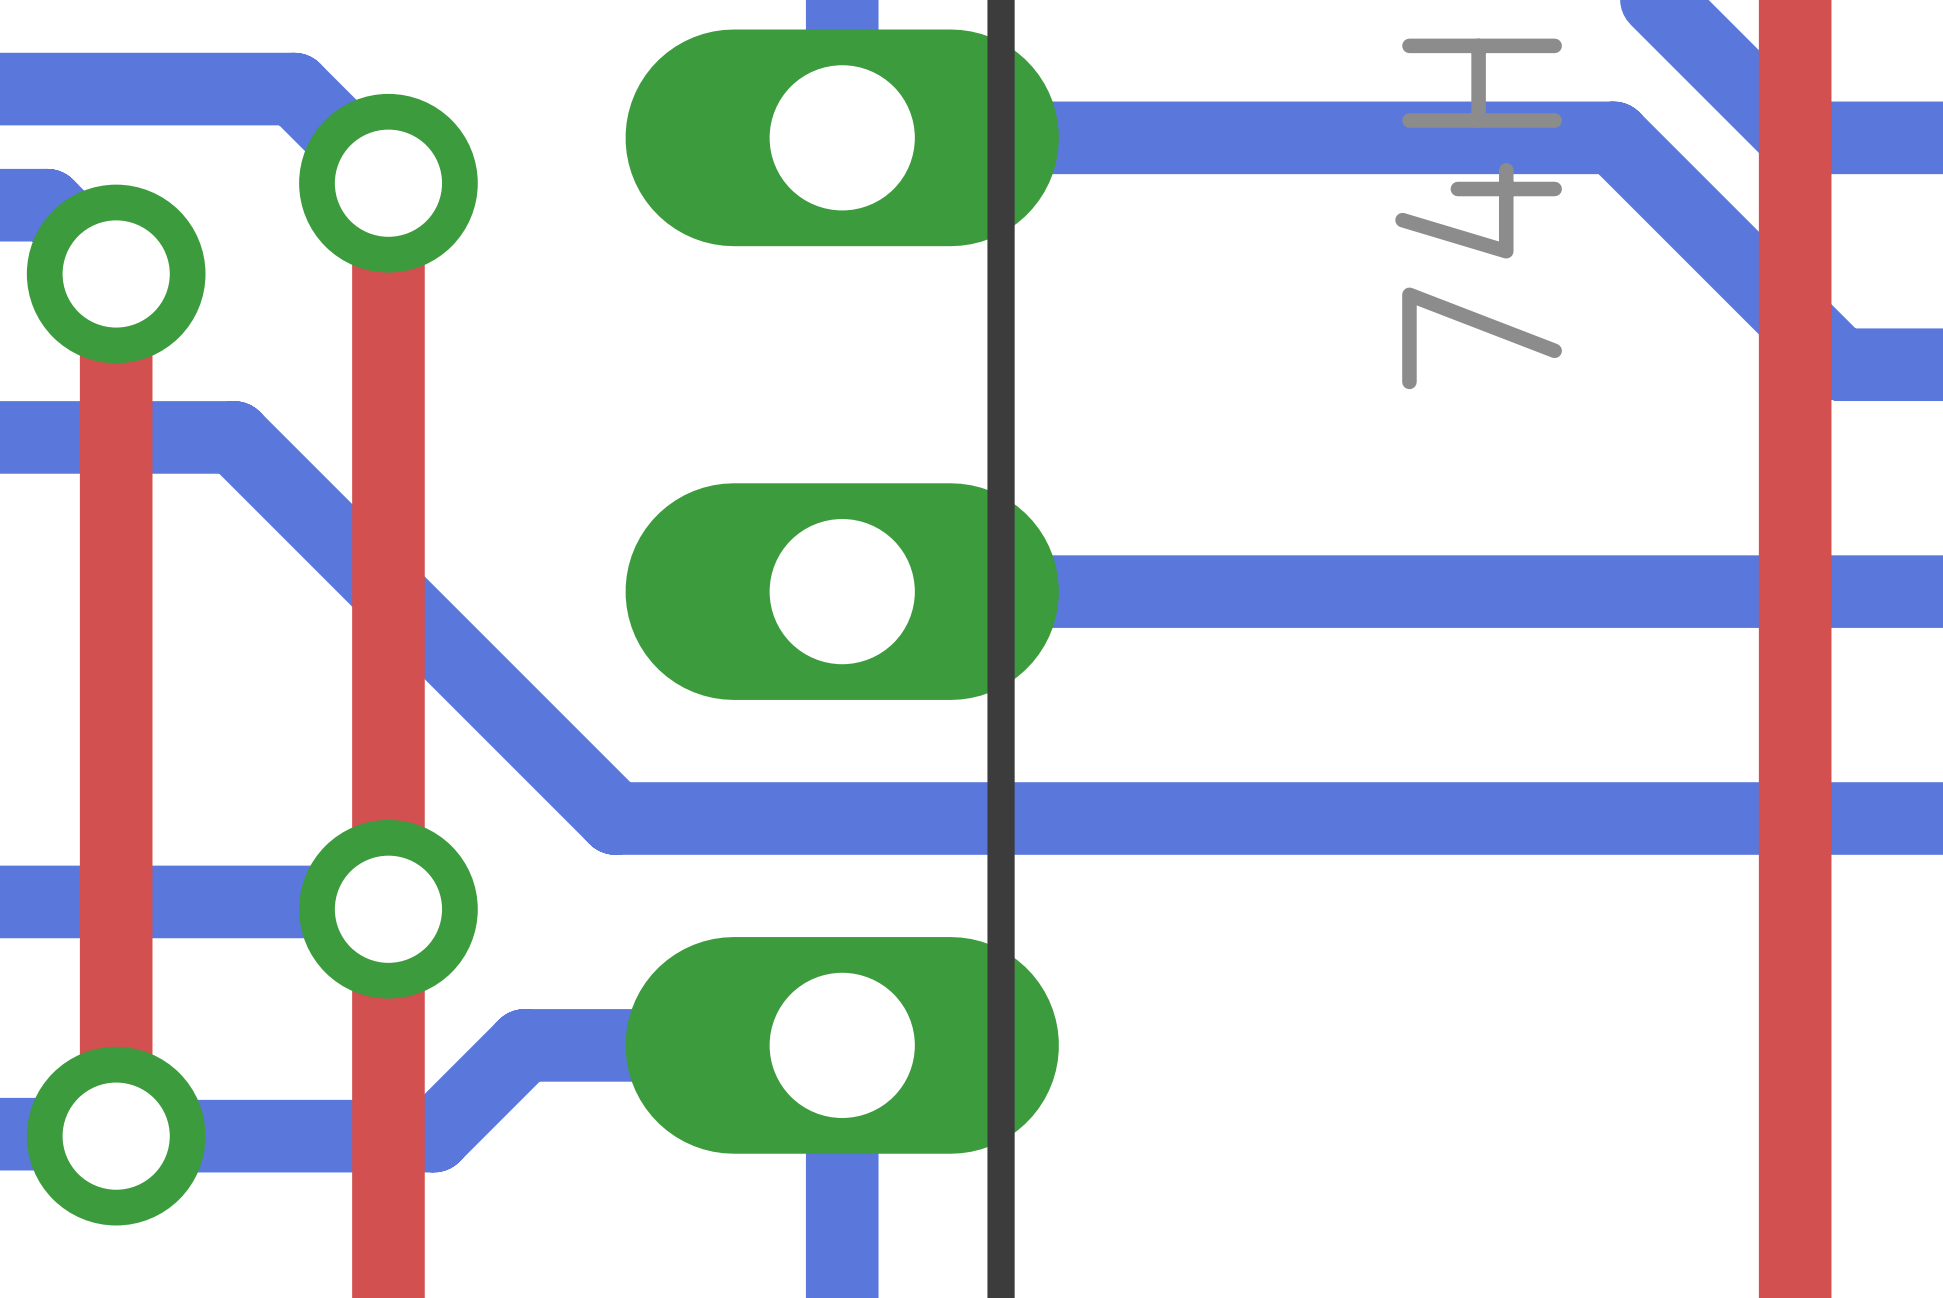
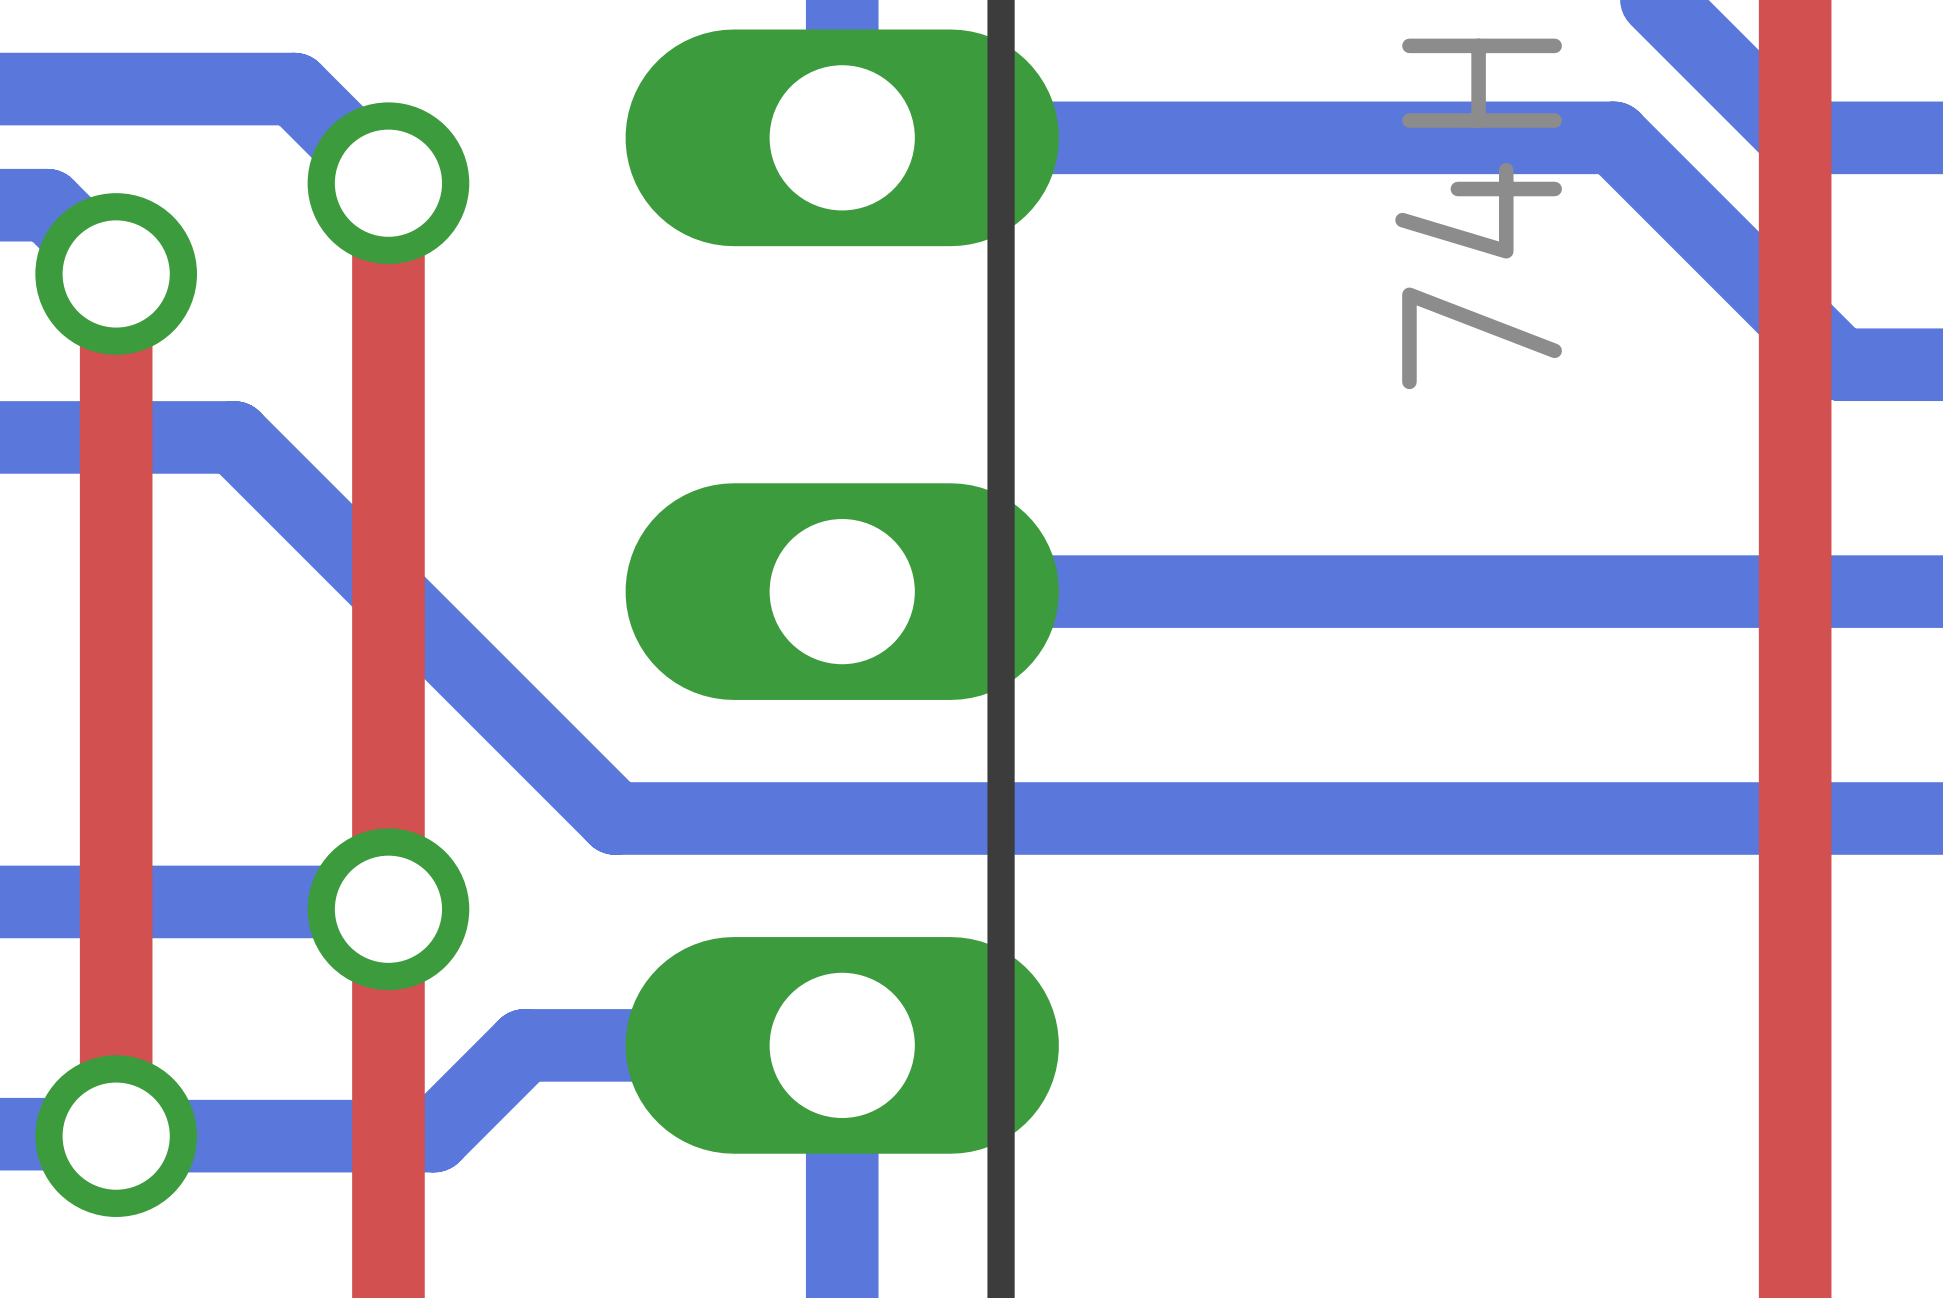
via size: [299, 93, 478, 273] -> [307, 102, 470, 265]
via size: [26, 184, 206, 364] -> [35, 193, 198, 355]
via size: [299, 819, 478, 999] -> [307, 828, 470, 991]
via size: [26, 1046, 206, 1226] -> [35, 1055, 198, 1217]

